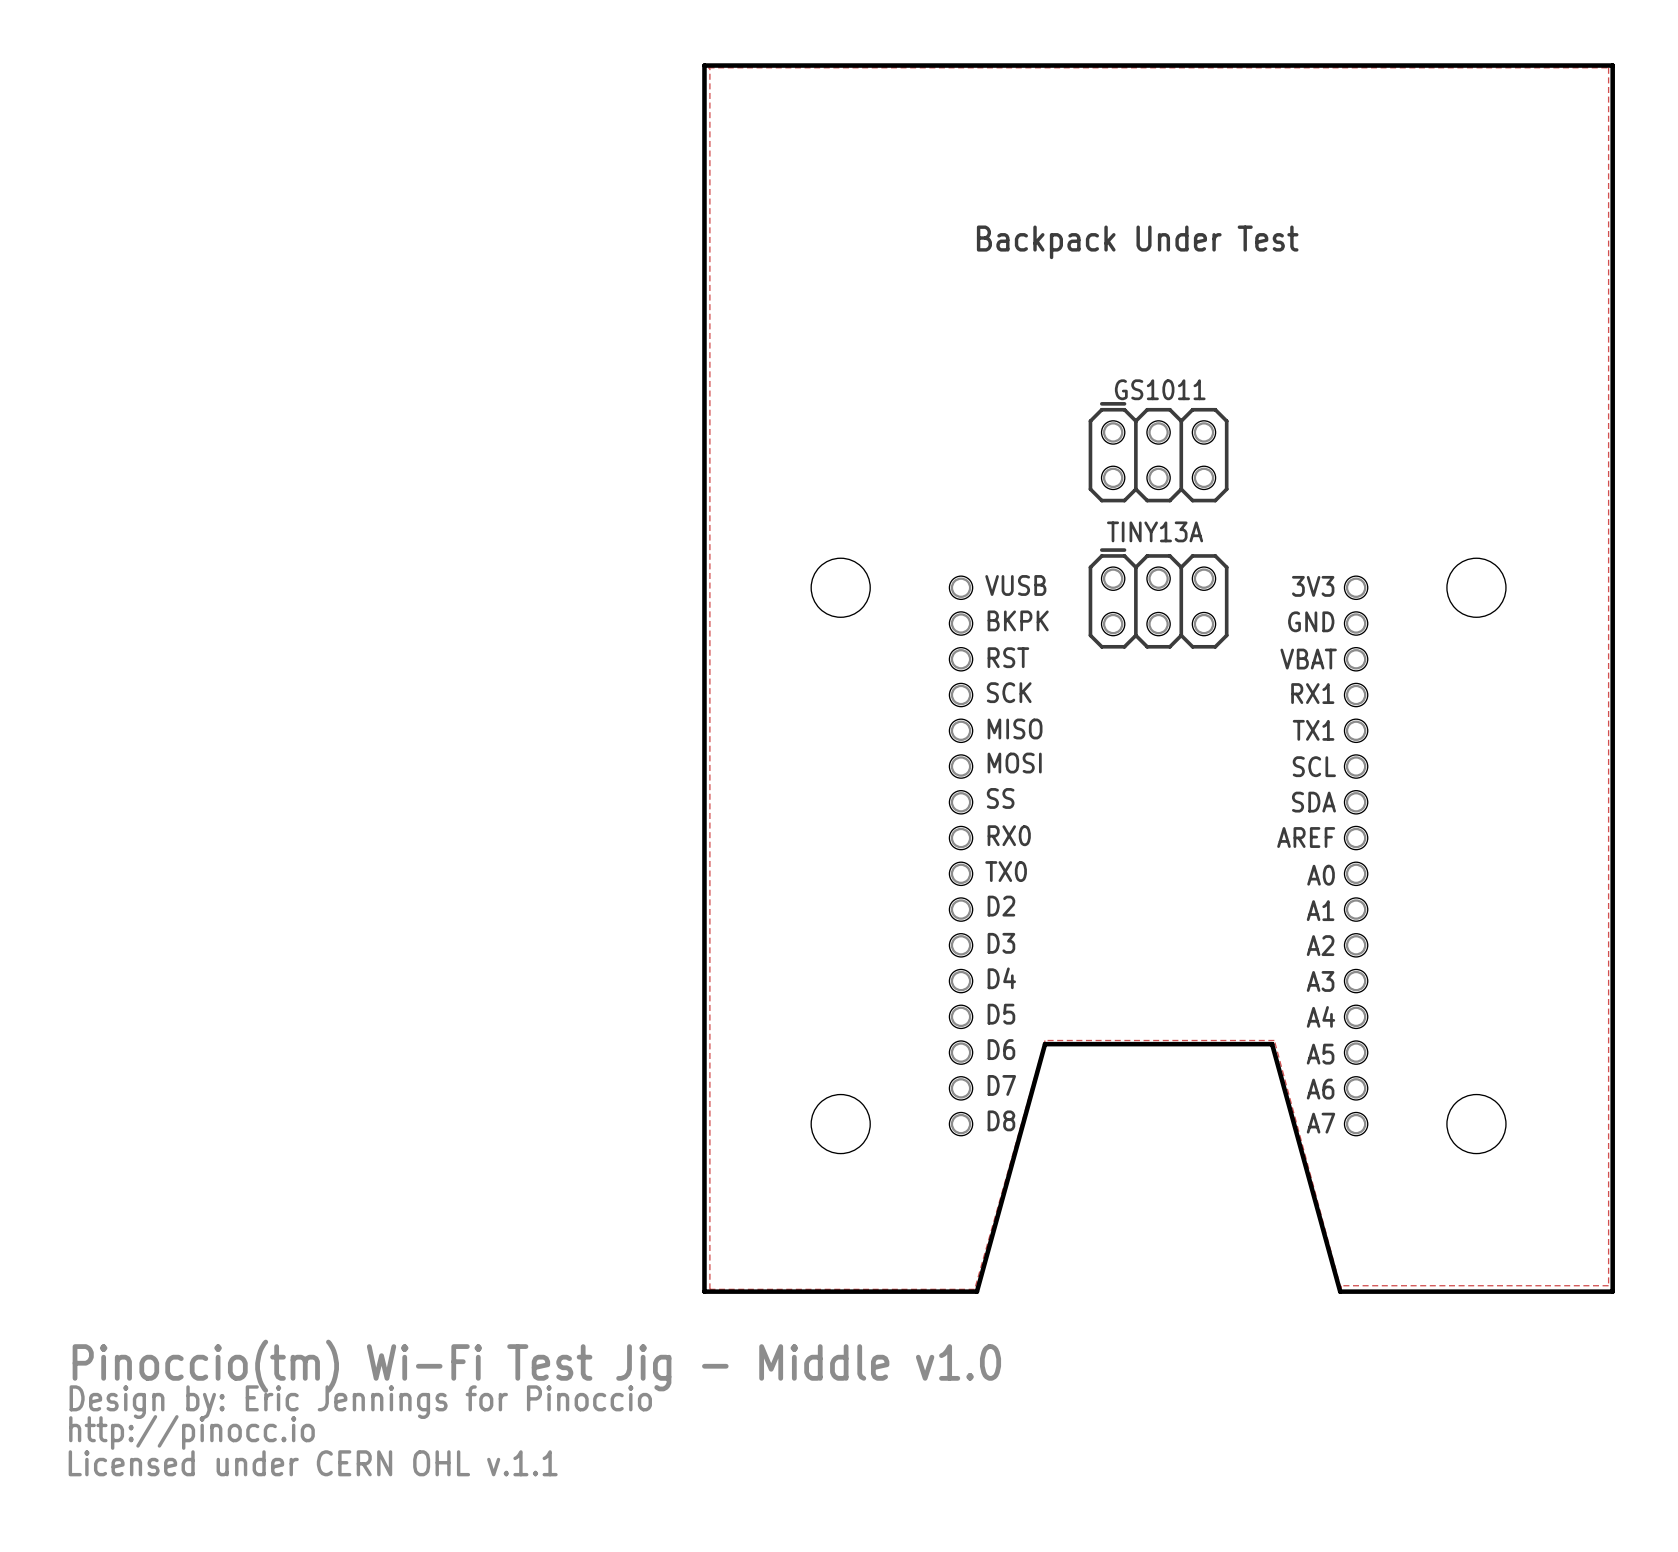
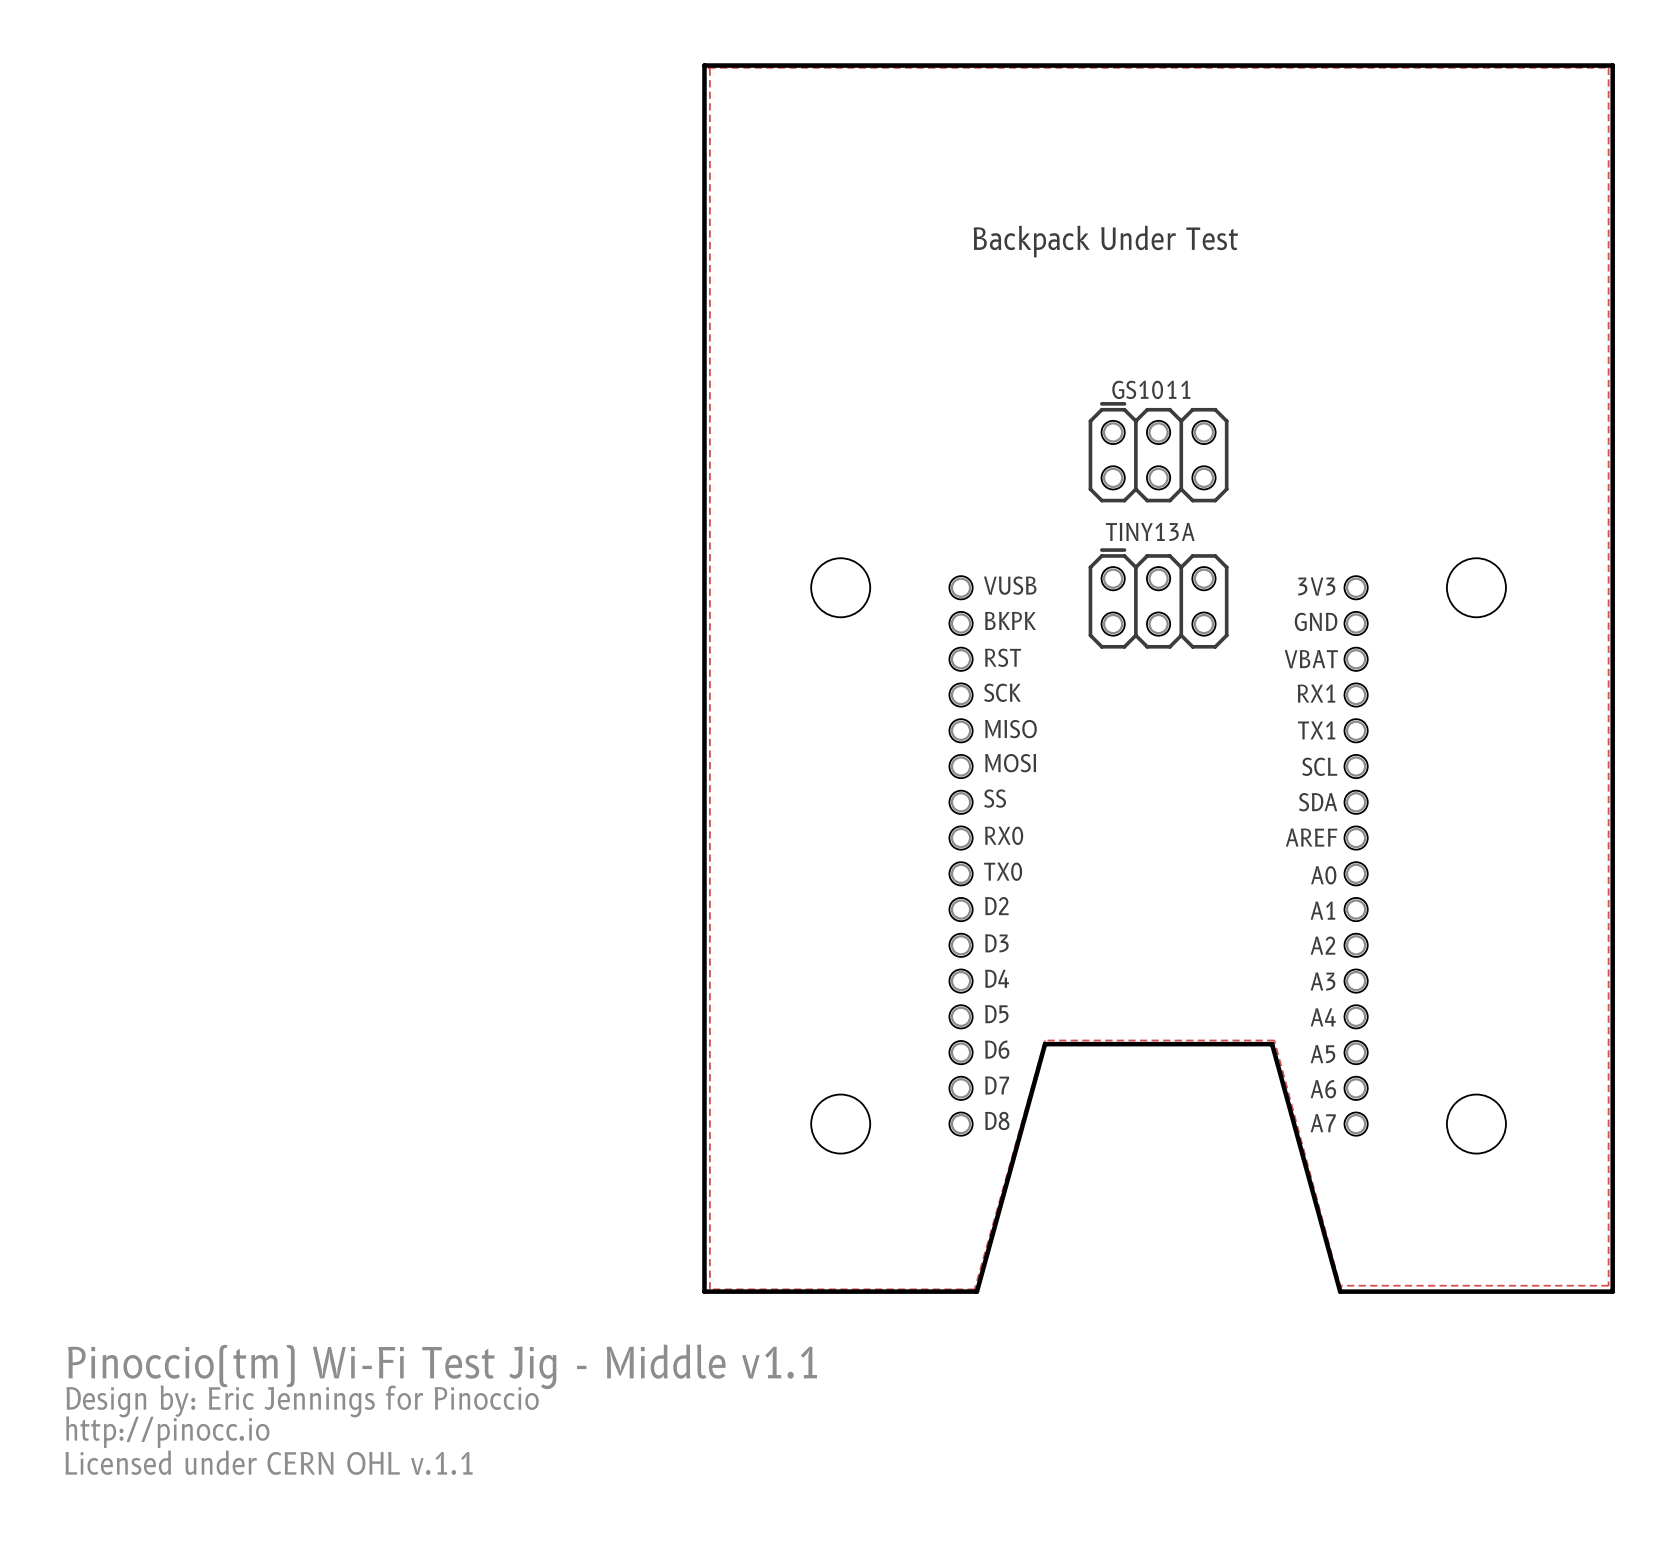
text: Pinoccio(tm) Wi-Fi Test Jig - Middle v1.0 (536, 1366) -> Pinoccio(tm) Wi-Fi Test Jig - Middle v1.1 (442, 1366)

